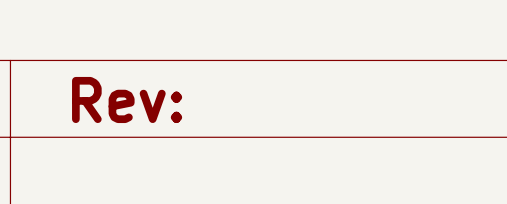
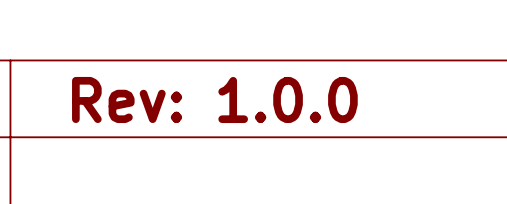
title block: Rev: (127, 99) -> Rev: 1.0.0 (214, 99)

